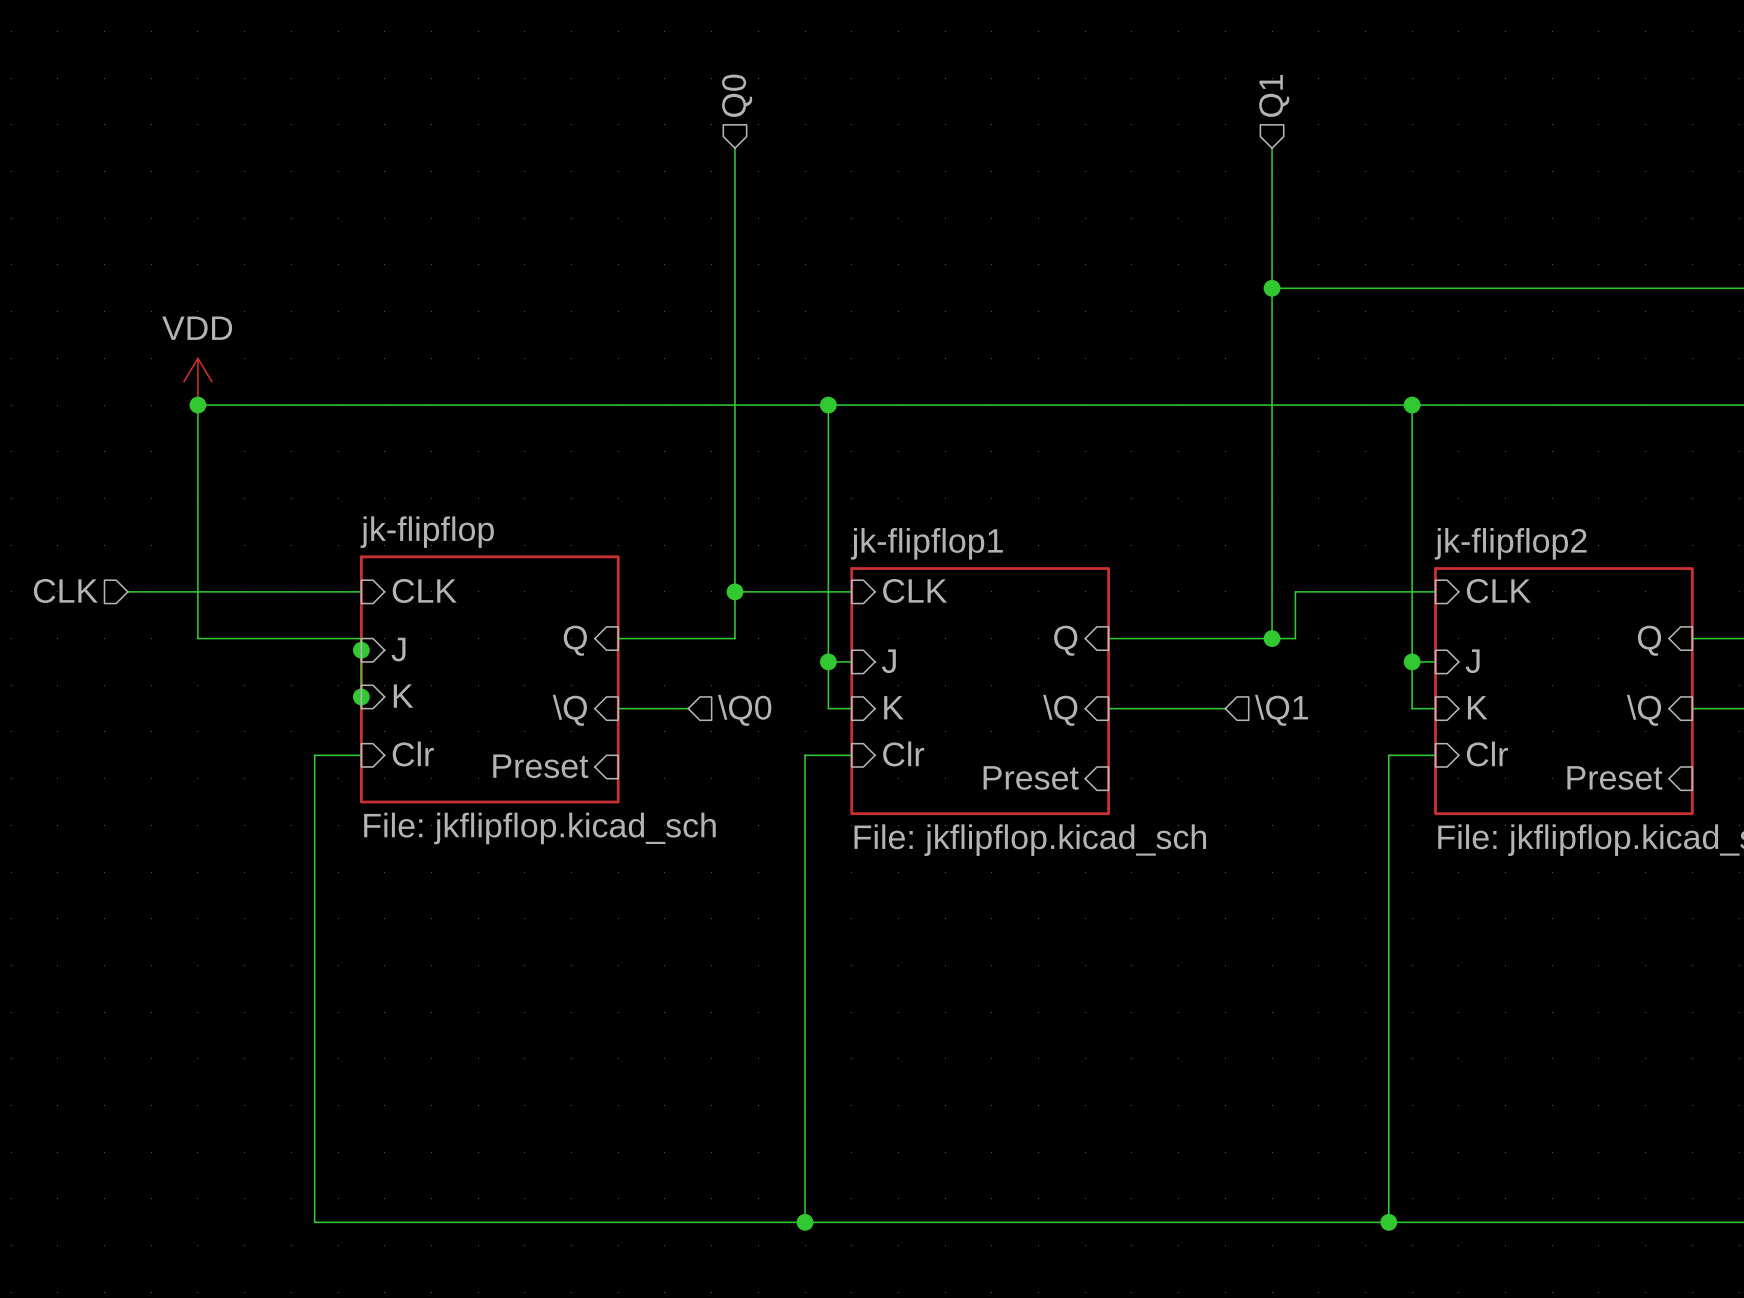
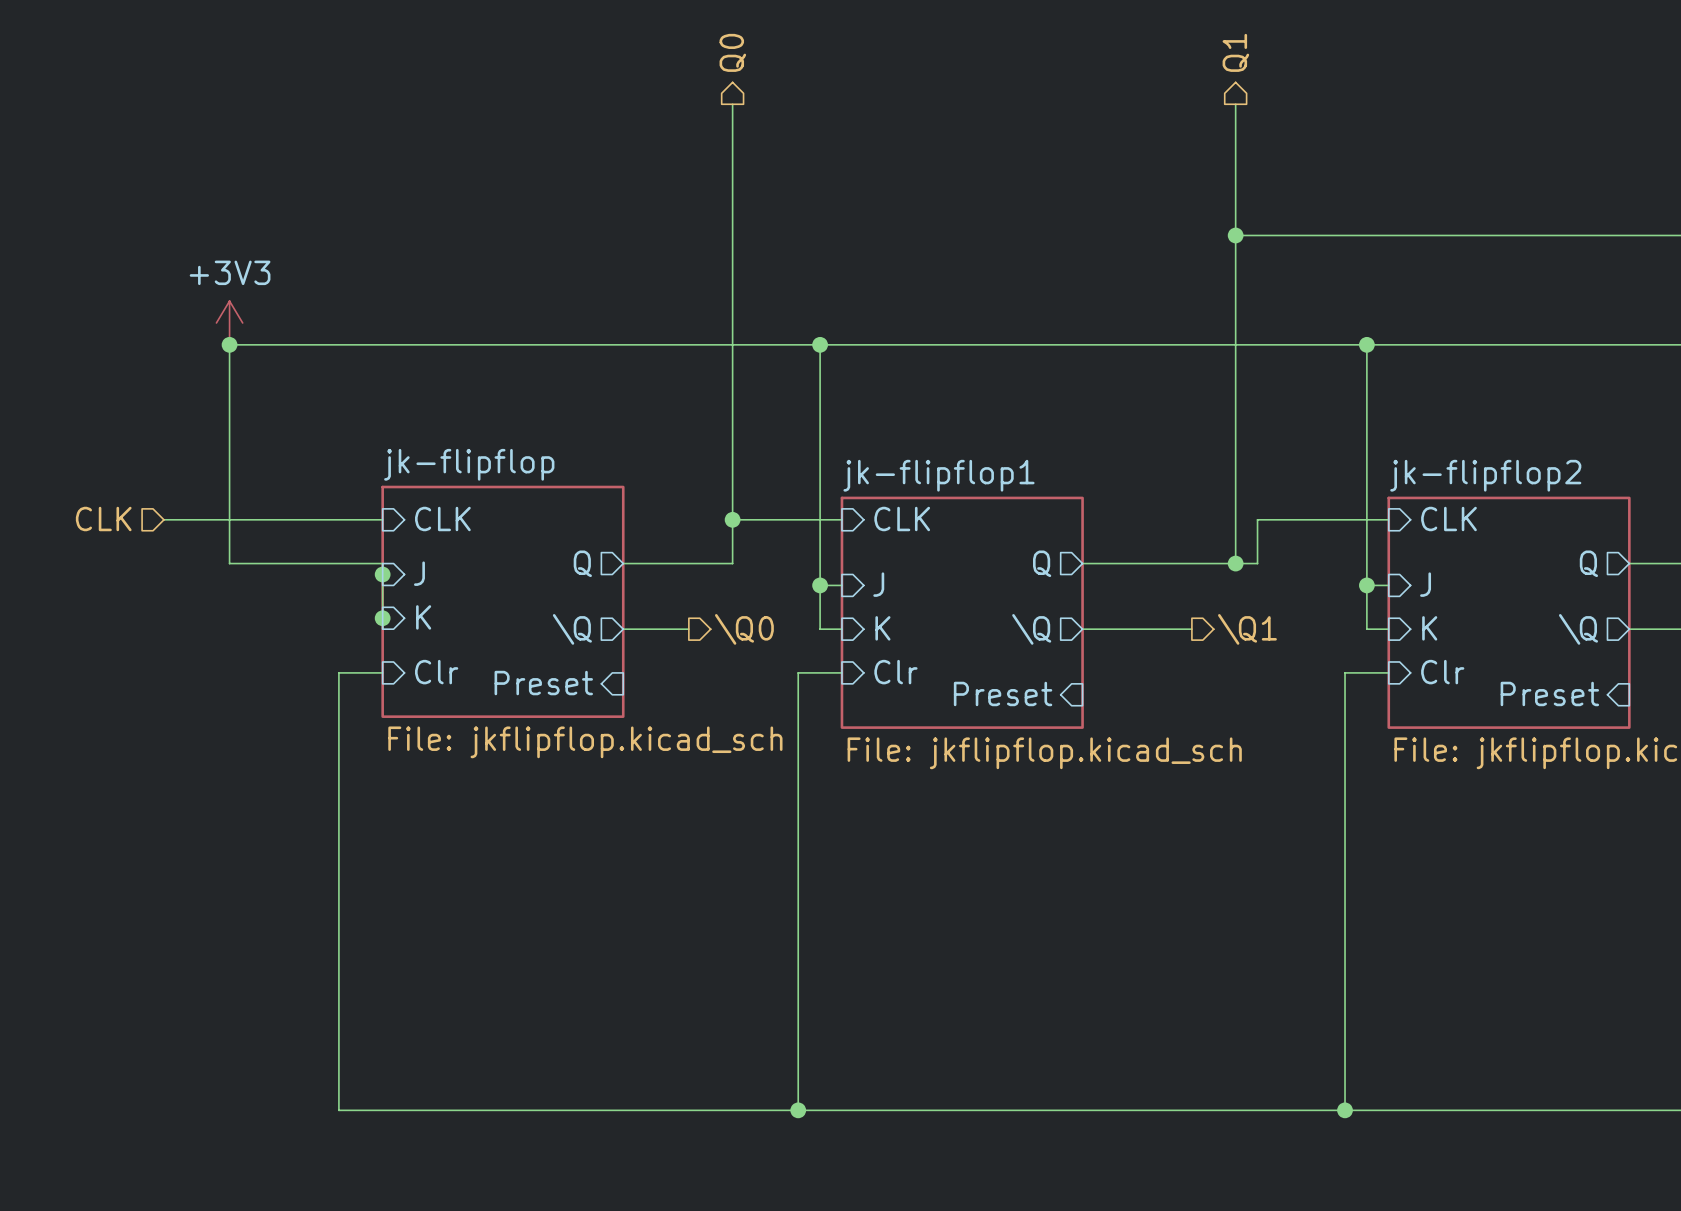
hierarchical label shape: input (737, 95) -> output (732, 52)
hierarchical label shape: input (1274, 95) -> output (1235, 52)
power symbol: VDD (197, 381) -> +3V3 (229, 322)
sheet pin shape: input (575, 640) -> output (582, 563)
sheet pin shape: input (1065, 640) -> output (1042, 563)
sheet pin shape: input (1649, 640) -> output (1588, 563)
sheet pin shape: input (569, 710) -> output (572, 629)
hierarchical label shape: input (744, 710) -> output (744, 629)
sheet pin shape: input (1060, 710) -> output (1031, 629)
hierarchical label shape: input (1281, 710) -> output (1247, 629)
sheet pin shape: input (1643, 710) -> output (1578, 629)

